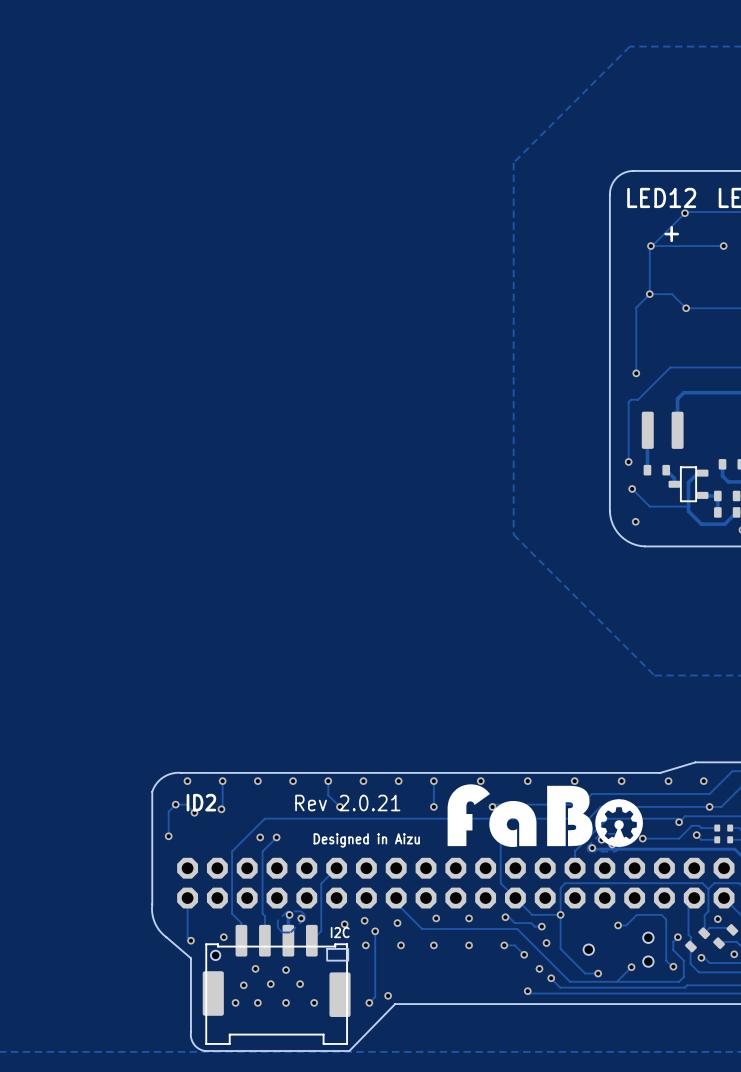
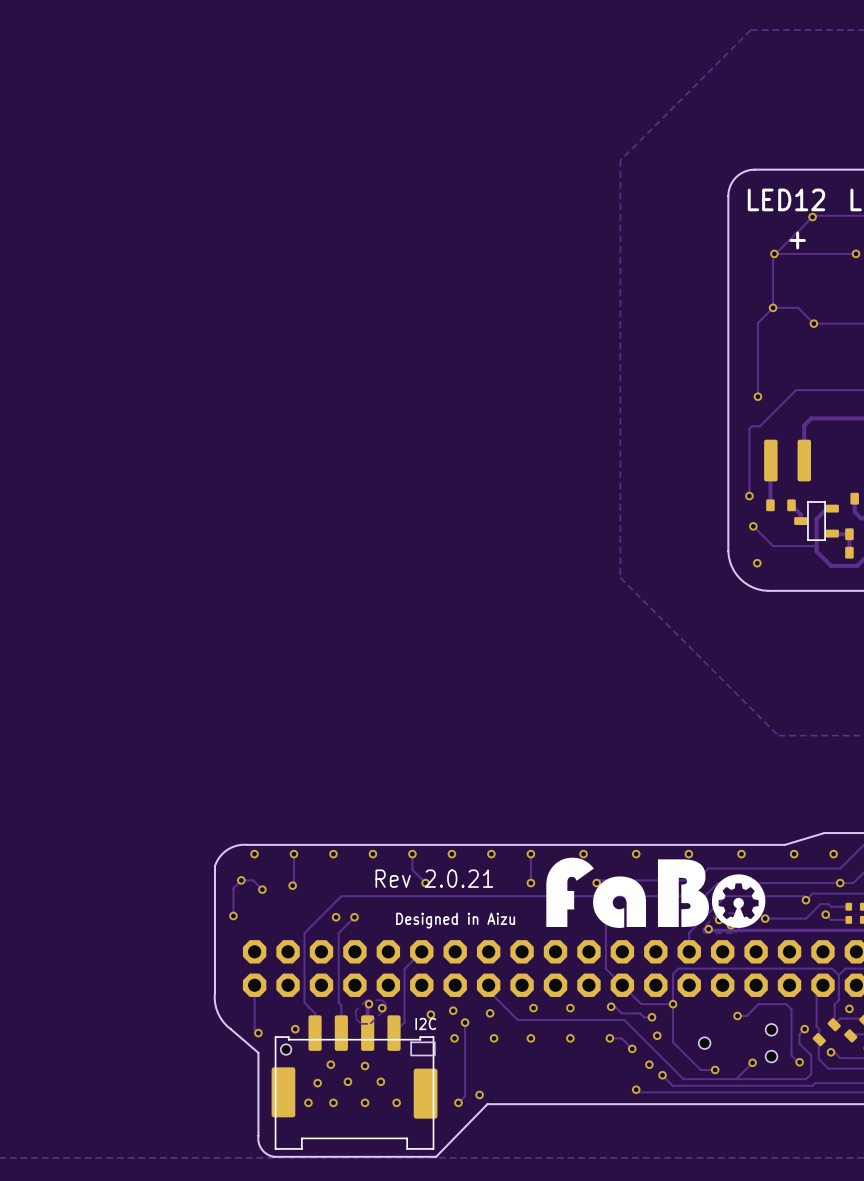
text: ID2 (201, 802) -> none

